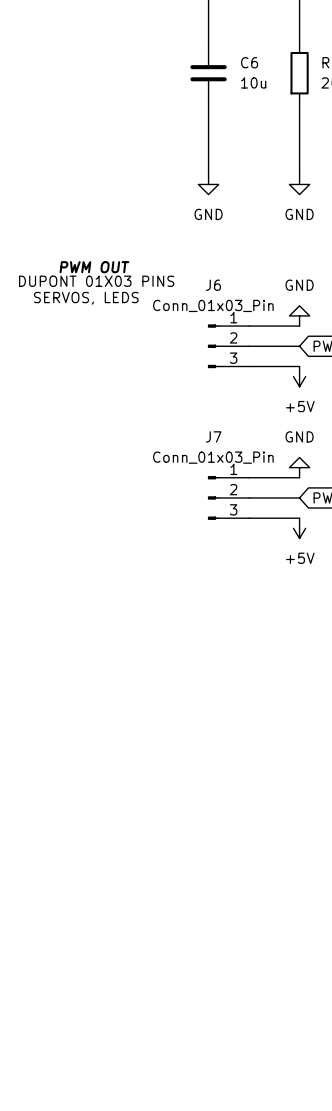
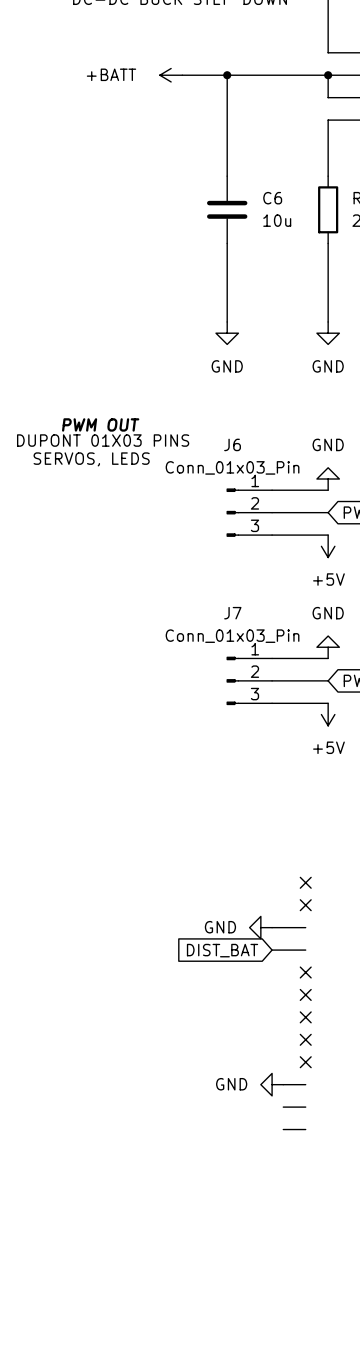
no-connect mark: none -> (305, 882)
no-connect mark: none -> (305, 905)
power symbol: none -> GND (260, 927)
wire: none -> (272, 927) (305, 927)
wire: none -> (272, 950) (305, 950)
global label: none -> DIST_BAT (222, 950)
no-connect mark: none -> (305, 972)
no-connect mark: none -> (305, 994)
no-connect mark: none -> (305, 1017)
no-connect mark: none -> (305, 1039)
no-connect mark: none -> (305, 1062)
power symbol: none -> GND (272, 1084)
wire: none -> (283, 1084) (305, 1084)
wire: none -> (283, 1107) (305, 1107)
wire: none -> (283, 1129) (305, 1129)

